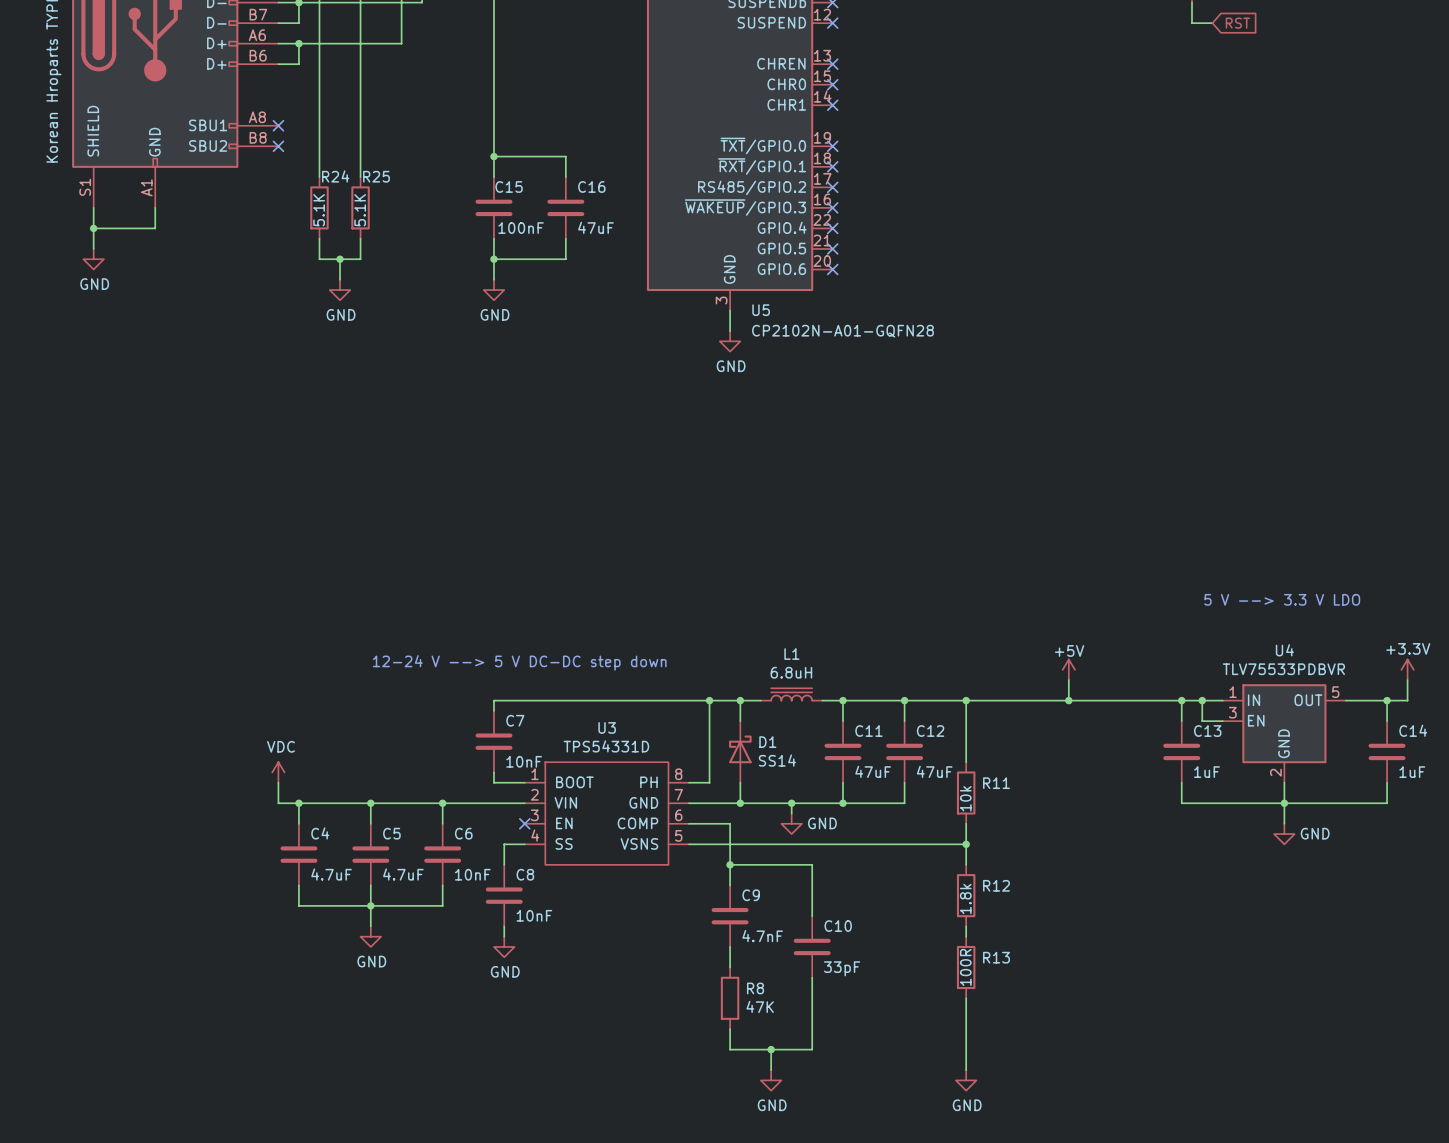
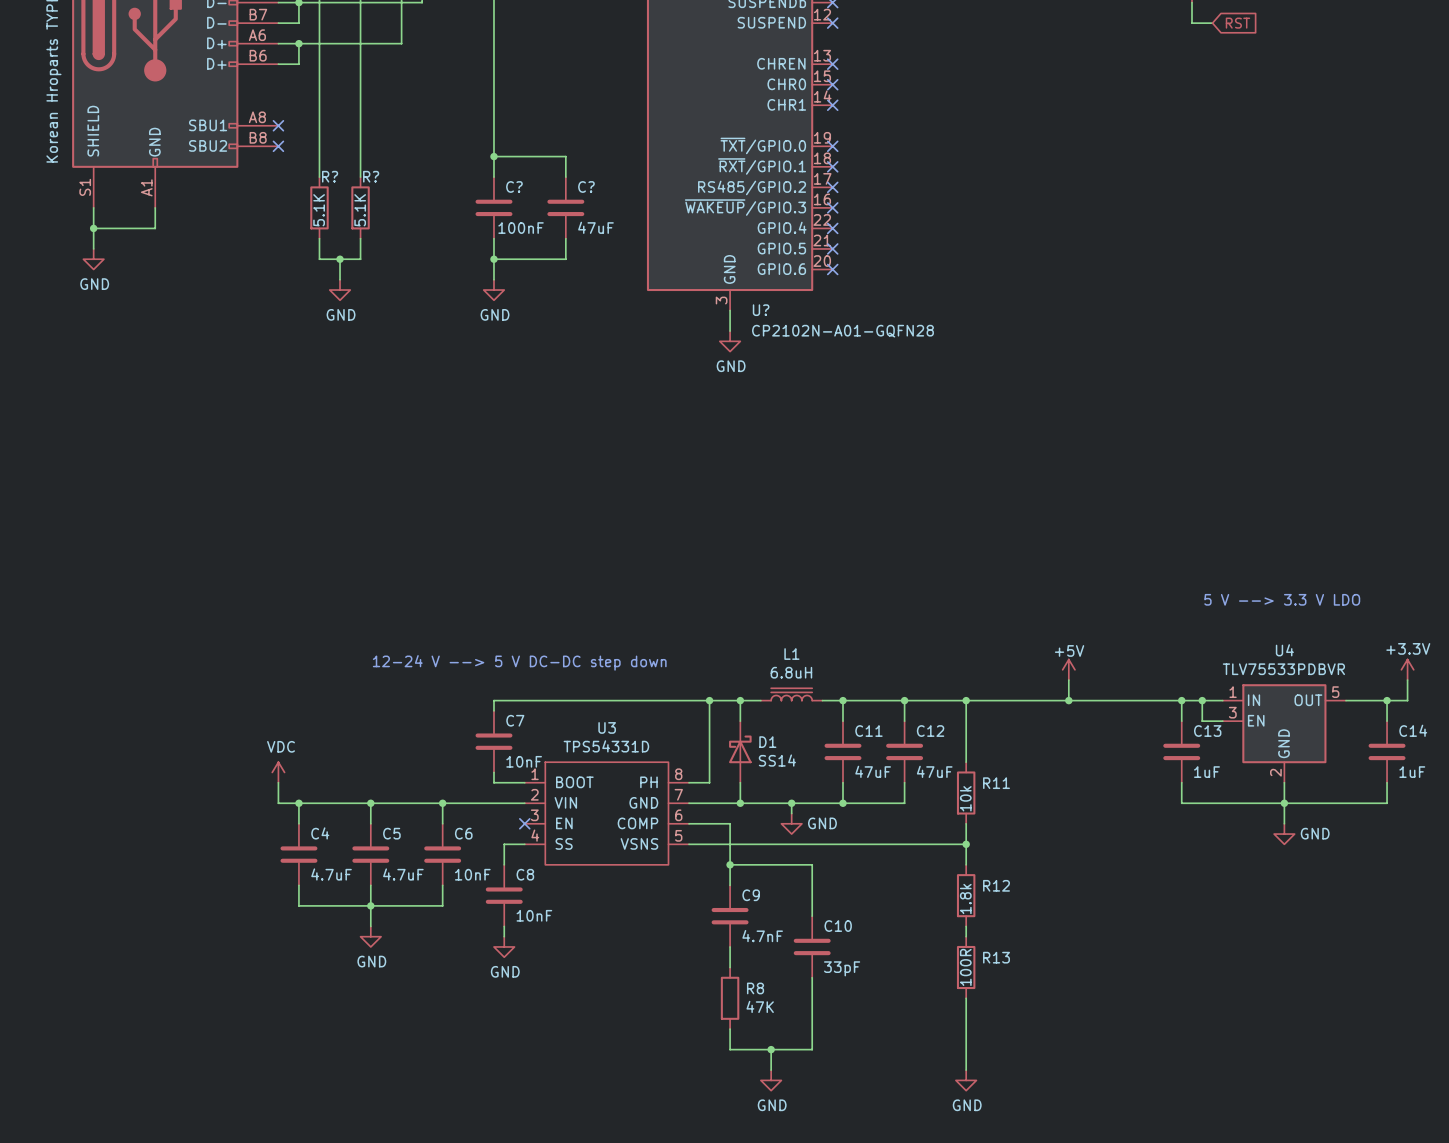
R24 name: R24 (335, 176) -> R? (330, 176)
R25 name: R25 (376, 176) -> R? (371, 176)
C15 name: C15 (509, 186) -> C? (514, 186)
C16 name: C16 (591, 186) -> C? (586, 186)
U5 name: U5 (761, 310) -> U? (761, 310)

